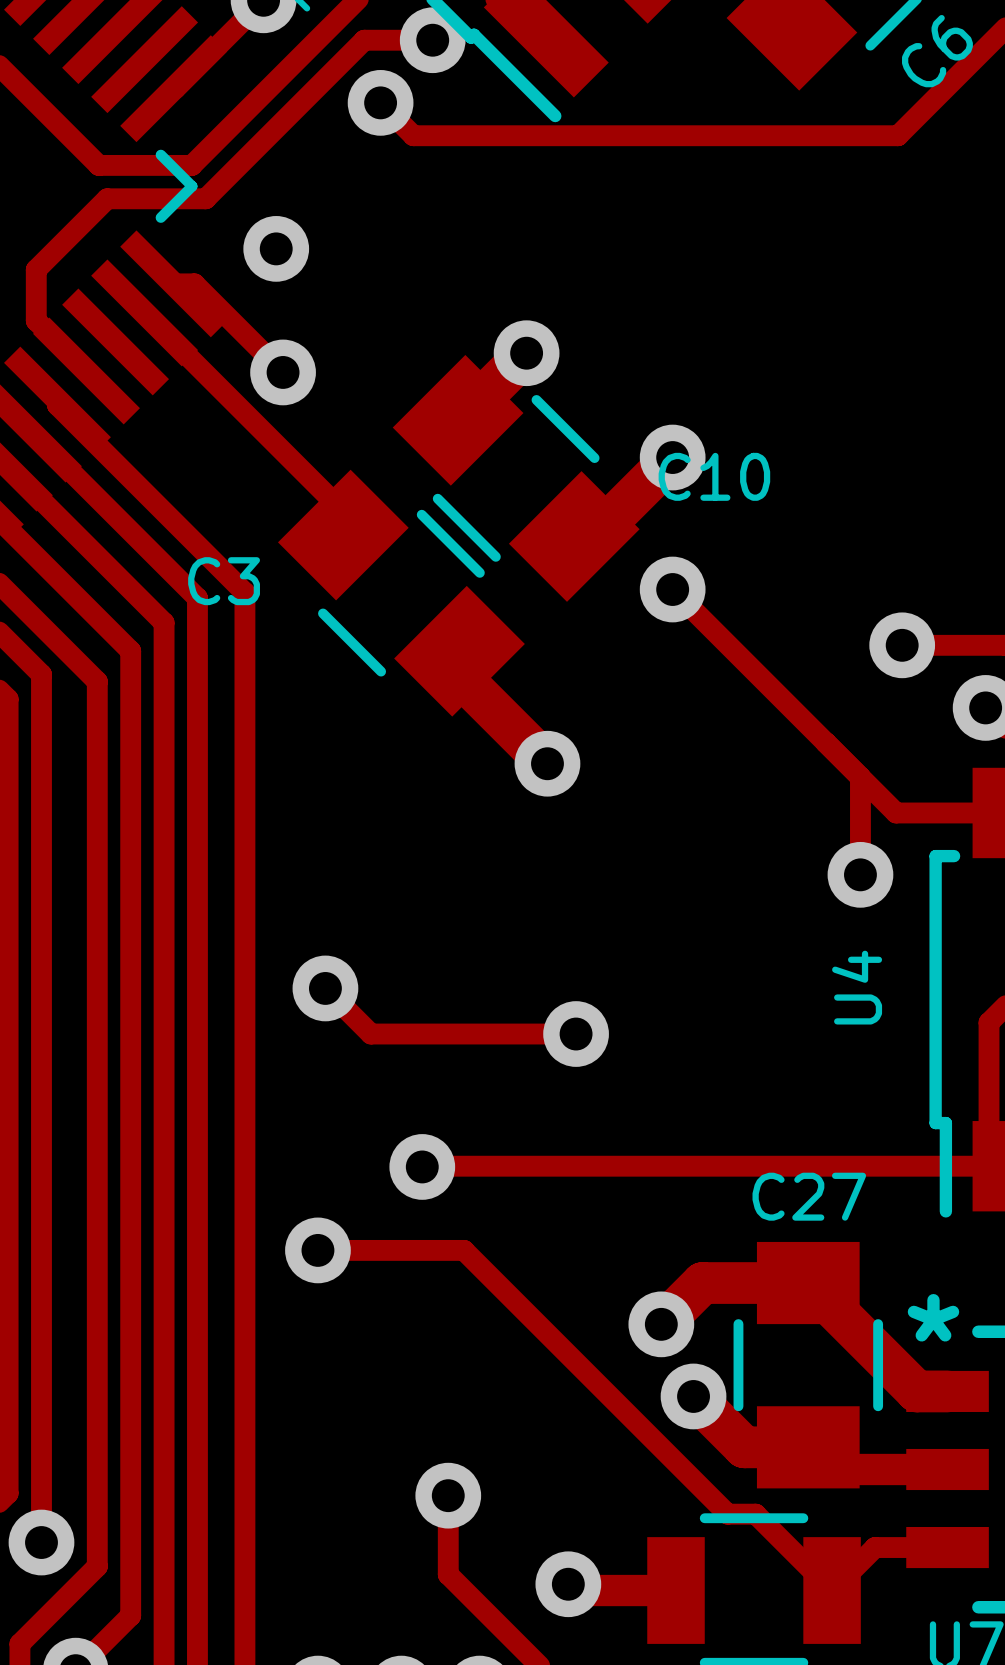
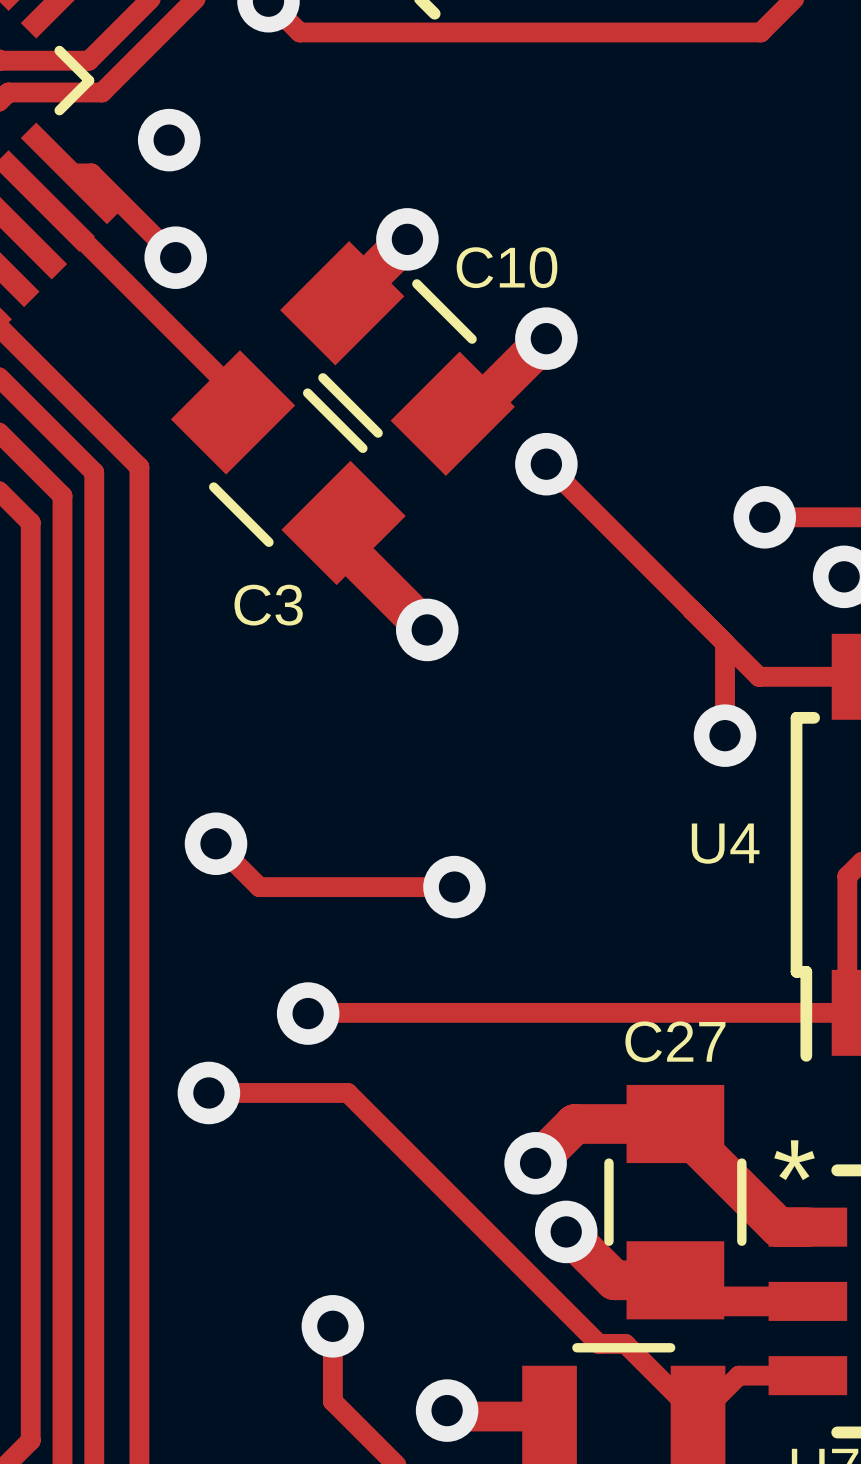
C10 name position: C10 (714, 476) -> C10 (507, 267)
C3 name position: C3 (224, 581) -> C3 (268, 605)
U4 name rotation: 0° (857, 987) -> 90° clockwise (725, 843)

